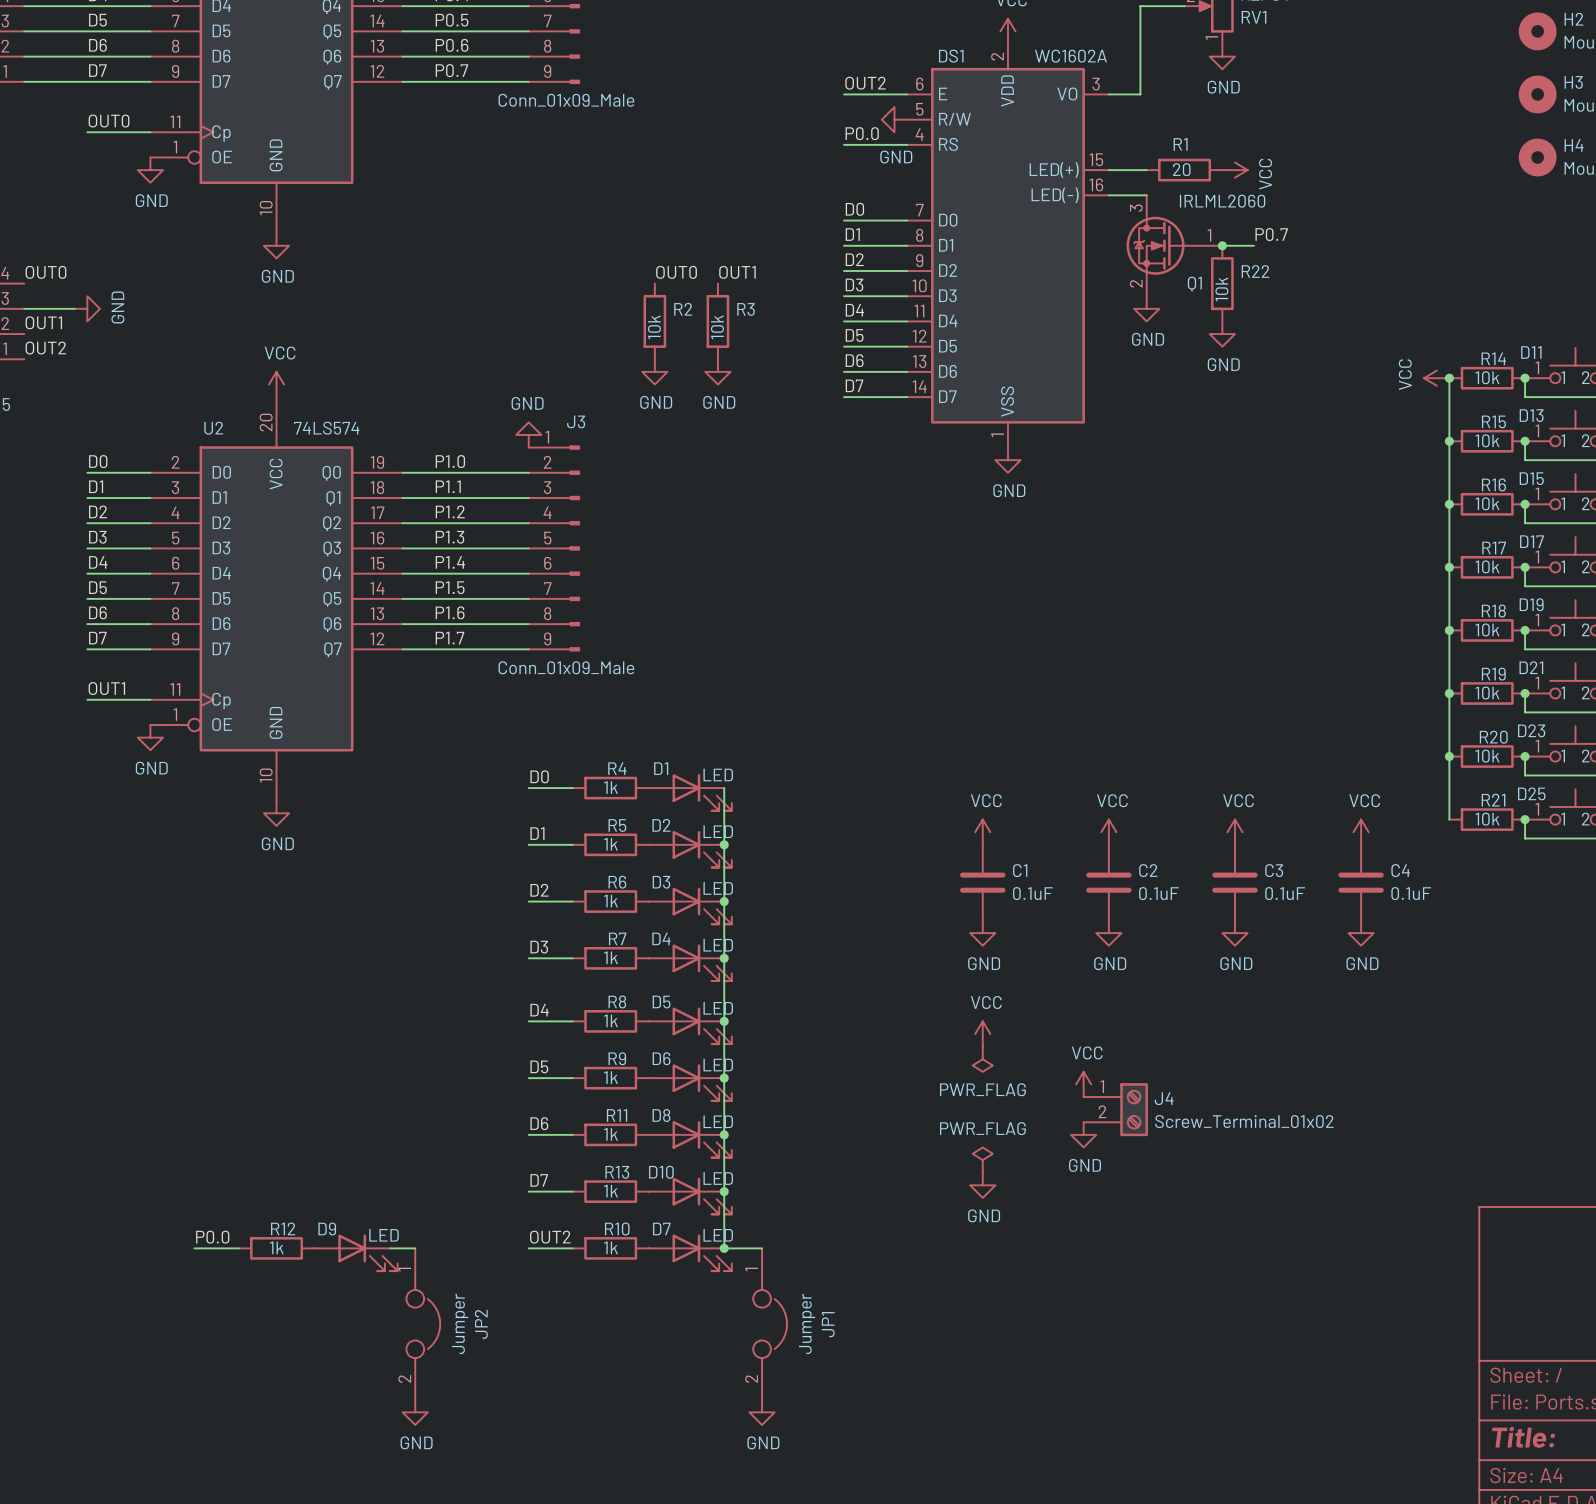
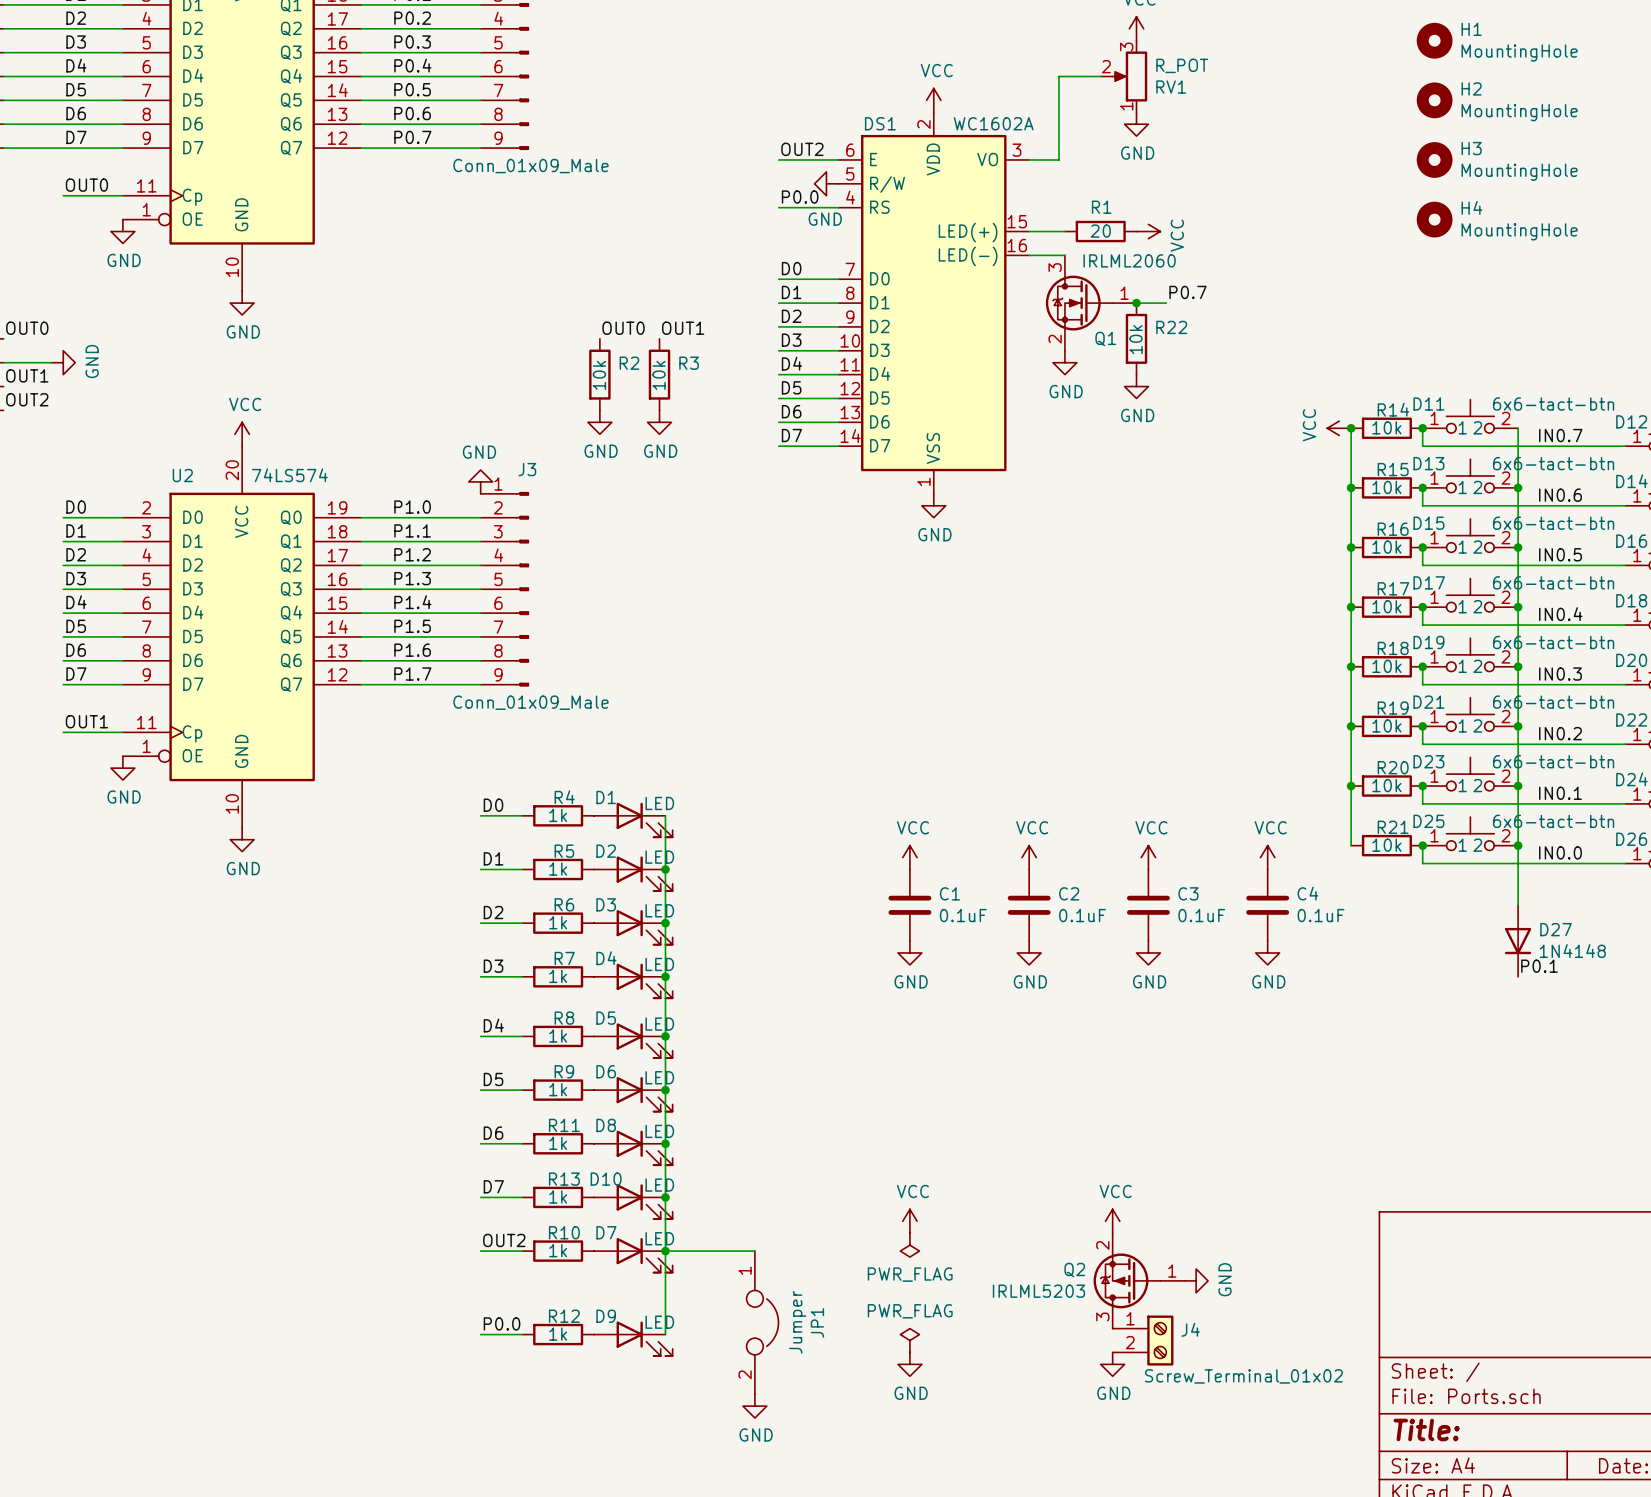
power symbol: VCC (982, 1033) -> none
power symbol: PWR_FLAG (982, 1059) -> none
power symbol: VCC (1083, 1084) -> none
J4 position: (1115, 1109) -> (1143, 1340)
J4 value position: Screw_Terminal_01x02 (1244, 1121) -> Screw_Terminal_01x02 (1243, 1376)
power symbol: GND (1083, 1134) -> none
power symbol rotation: 0° (982, 1160) -> 180° (909, 1245)
power symbol position: PWR_FLAG (982, 1160) -> PWR_FLAG (909, 1245)
power symbol: GND (982, 1185) -> none
power symbol: none -> VCC (909, 1221)
power symbol: none -> VCC (1112, 1221)
label: P0.0 (212, 1237) -> none
wire: (194, 1248) (238, 1248) -> none
R12 position: (276, 1248) -> (558, 1334)
wire: (390, 1248) (415, 1248) -> none
wire: none -> (665, 1251) (665, 1334)
wire: none -> (701, 1251) (754, 1251)
D9 position: (355, 1252) -> (633, 1338)
Q2: none -> IRLML5203 (1138, 1280)
power symbol: none -> GND (1196, 1280)
JP2: Jumper (423, 1324) -> none
JP1 position: (770, 1324) -> (762, 1322)
label: none -> P0.0 (502, 1323)
wire: none -> (480, 1334) (522, 1334)
power symbol: none -> PWR_FLAG (909, 1340)
power symbol: none -> GND (909, 1364)
power symbol: none -> GND (1112, 1364)
power symbol: GND (415, 1412) -> none
power symbol position: GND (762, 1412) -> GND (754, 1406)

